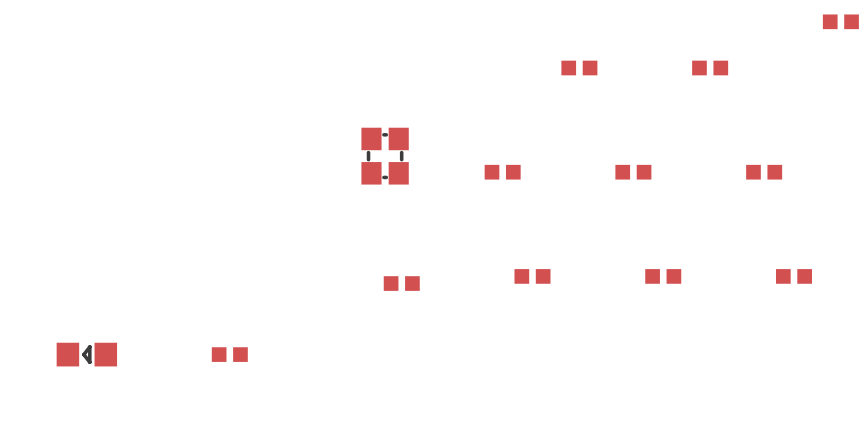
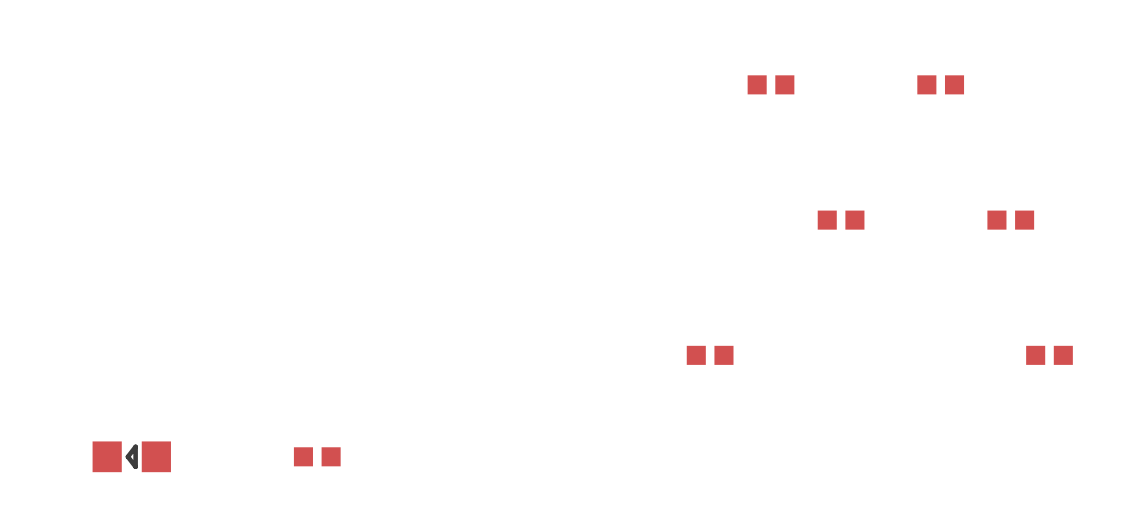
part: (840, 21) -> none
part: (385, 156) -> none
part: (502, 172) -> none
part: (663, 276) -> none
part: (401, 283) -> none

